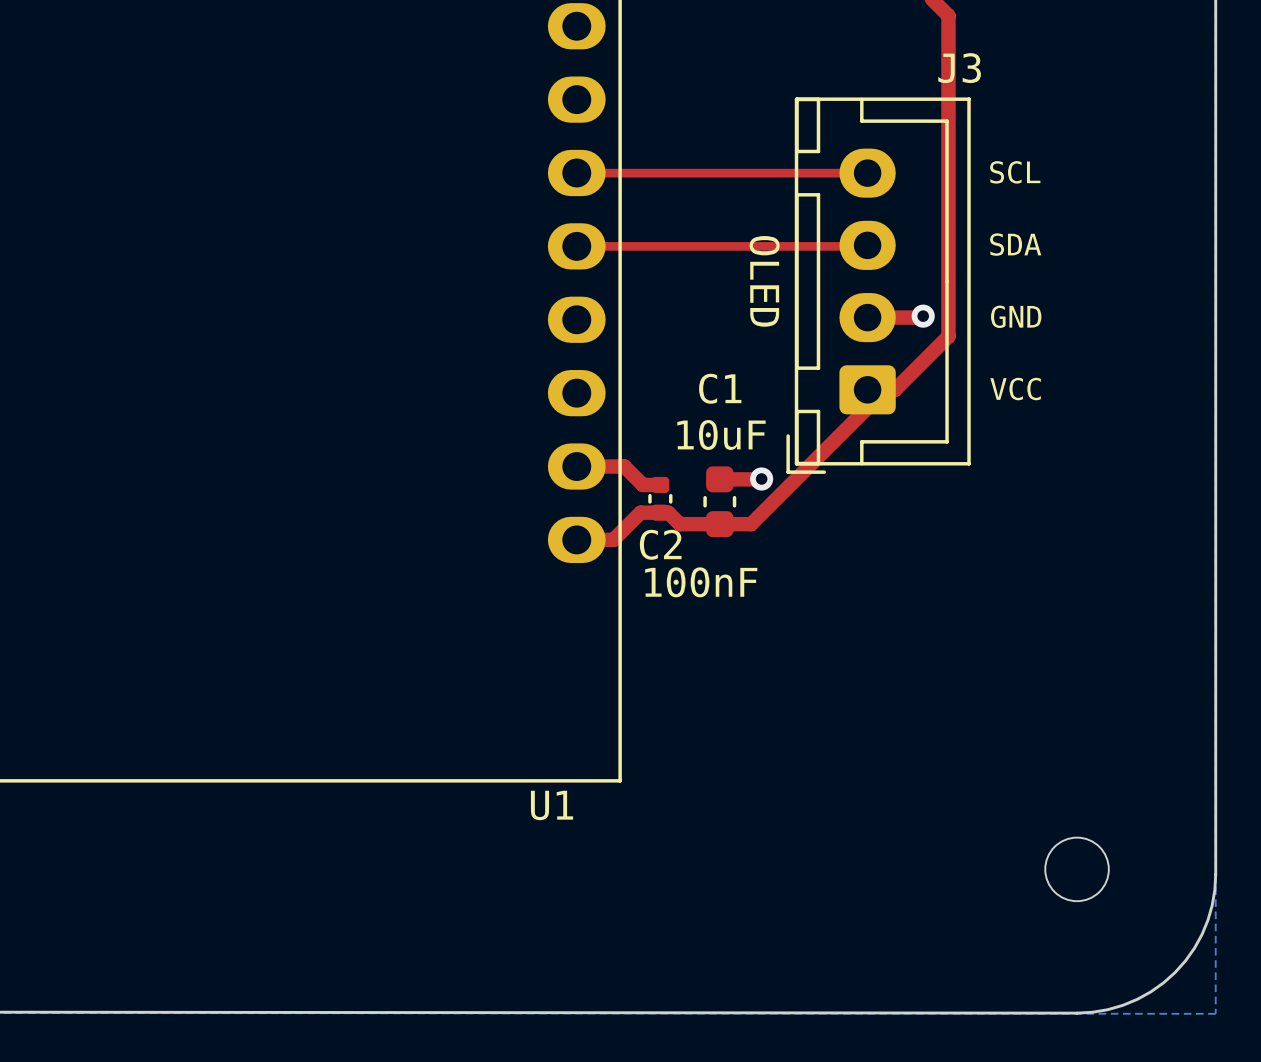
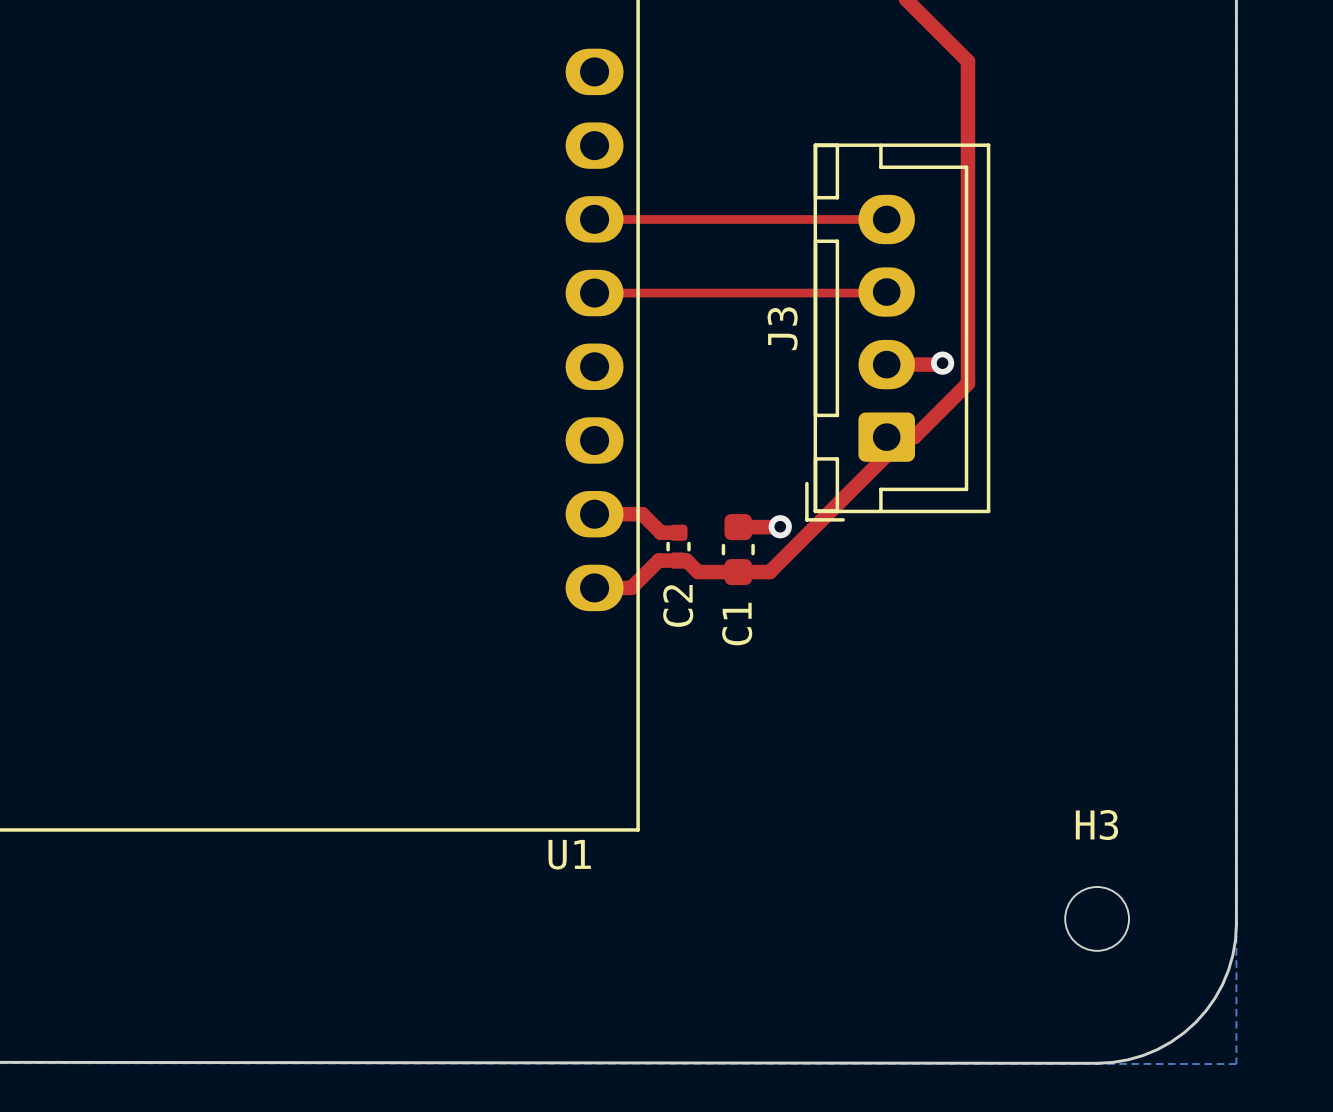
J3 name rotation: 0° (959, 68) -> 90° counterclockwise (782, 328)
J3 name position: J3 (959, 68) -> J3 (782, 328)
text: SCL (1015, 172) -> none
text: SDA (1015, 244) -> none
text: OLED (764, 281) -> none
text: GND (1016, 316) -> none
C1 name rotation: 0° (720, 388) -> 90° counterclockwise (737, 624)
C1 name position: C1 (720, 388) -> C1 (737, 624)
text: VCC (1015, 389) -> none
text: 10uF (721, 434) -> none
C2 name rotation: 0° (660, 544) -> 90° counterclockwise (678, 605)
text: 100nF (701, 582) -> none
H3 name: none -> H3 (1096, 824)

